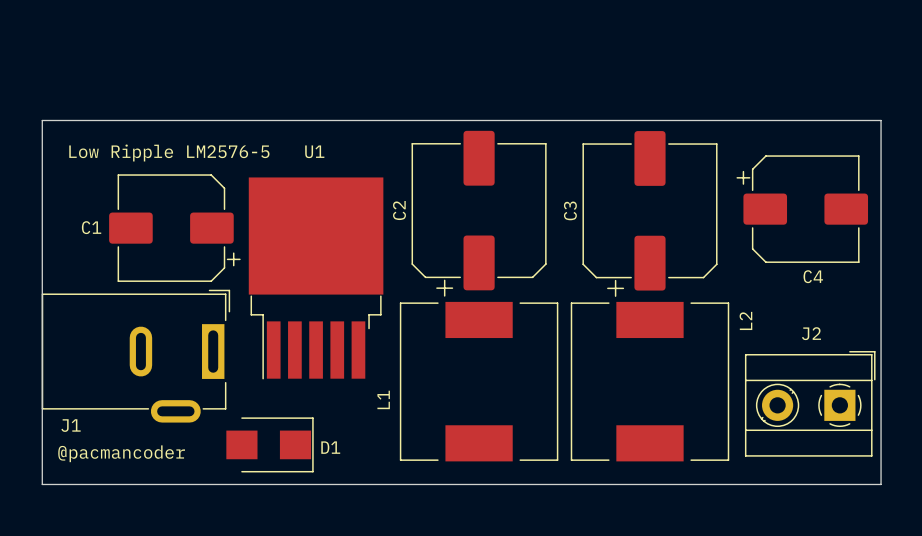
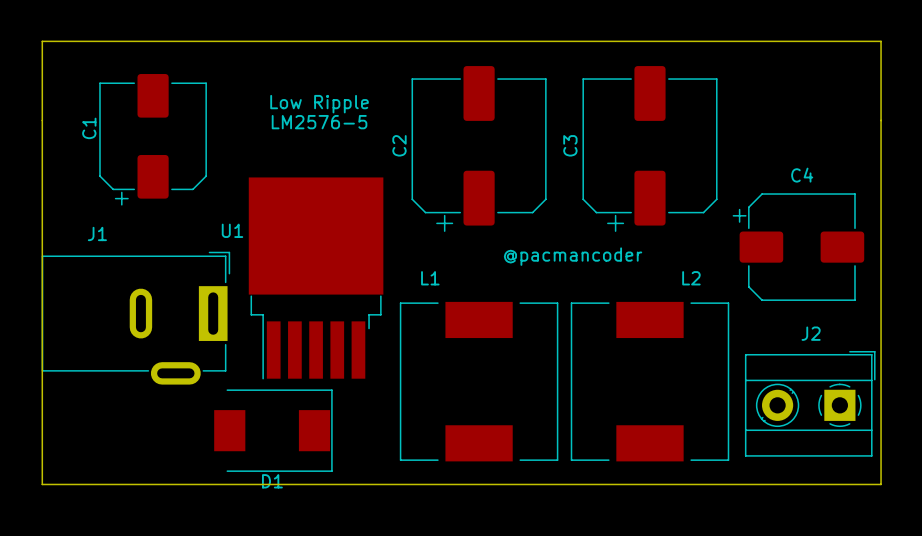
text: none -> Low Ripple (319, 104)
board edge: (42, 120) (881, 120) -> (42, 120) (42, 41) (881, 41) (881, 120)
text: none -> LM2576-5 (319, 122)
U1 name position: U1 (314, 151) -> U1 (232, 230)
text: Low Ripple LM2576-5 (169, 153) -> none
C4 position: (802, 209) -> (798, 247)
C2 position: (479, 213) -> (479, 148)
C3 position: (649, 213) -> (649, 148)
C1 rotation: 0° (174, 228) -> 90° clockwise (153, 139)
C1 position: (174, 228) -> (153, 139)
text: none -> @pacmancoder (573, 256)
C4 name position: C4 (813, 276) -> C4 (802, 175)
J1 footprint: [41, 289, 231, 423] -> [41, 251, 231, 385]
L2 name rotation: 0° (745, 320) -> 90° clockwise (691, 278)
L2 name position: L2 (745, 320) -> L2 (691, 278)
L1 name rotation: 0° (383, 399) -> 90° clockwise (430, 278)
L1 name position: L1 (383, 399) -> L1 (430, 278)
D1 footprint: [226, 417, 314, 473] -> [214, 389, 333, 472]
J1 name position: J1 (71, 425) -> J1 (97, 233)
D1 name position: D1 (330, 447) -> D1 (272, 481)
text: @pacmancoder (121, 453) -> none

